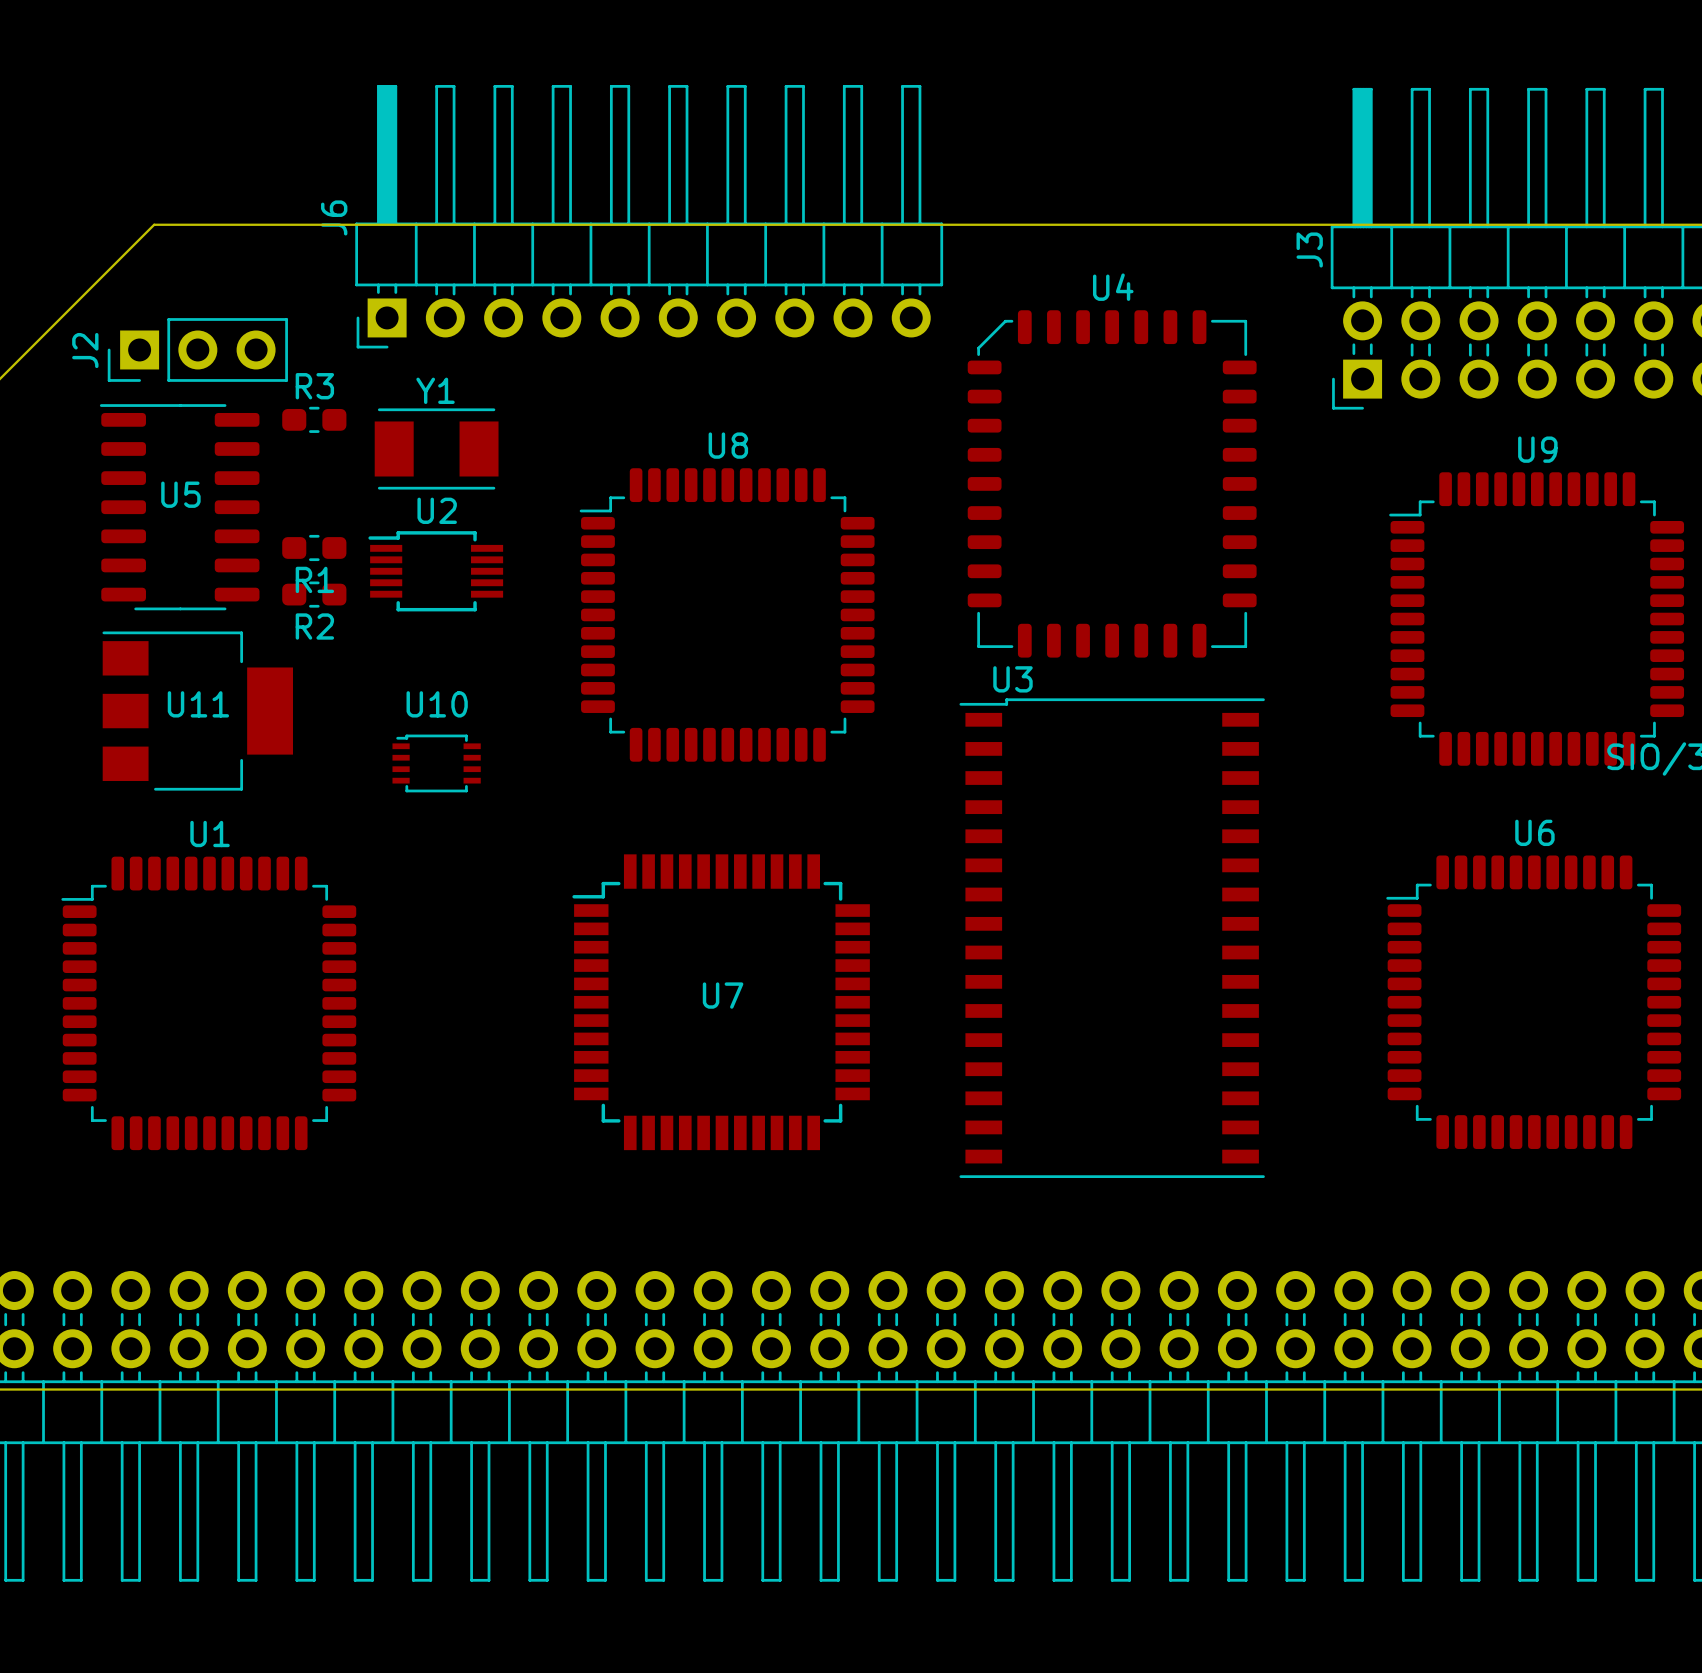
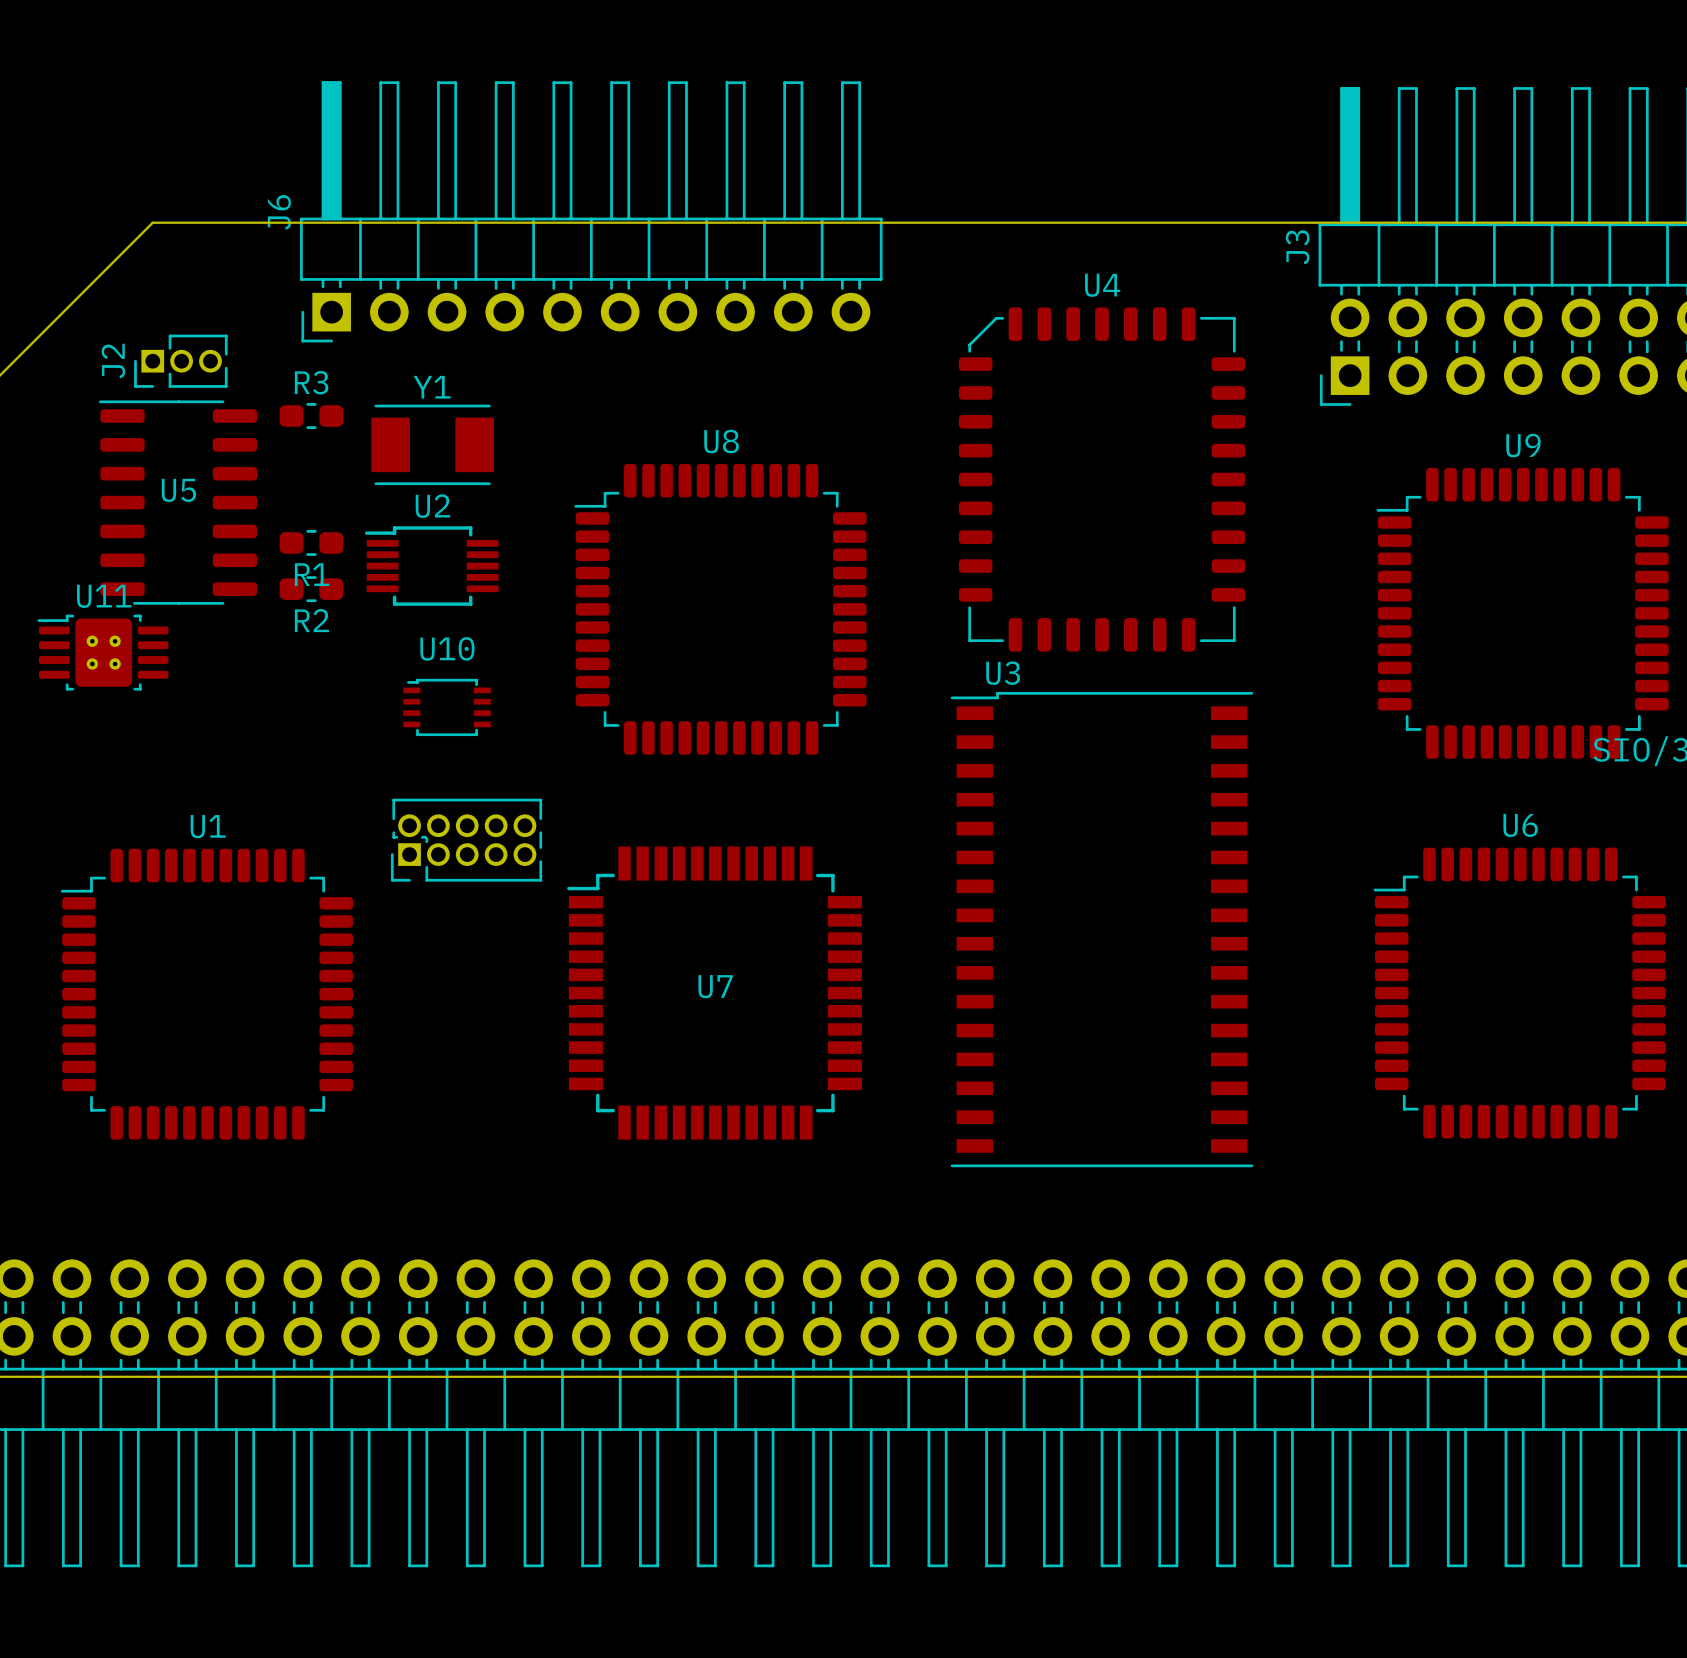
J6 position: (649, 216) -> (591, 211)
J2 footprint: [107, 318, 288, 382] -> [134, 334, 228, 388]
U11 footprint: [102, 631, 294, 791] -> [37, 614, 169, 691]
U11 name position: U11 (198, 704) -> U11 (104, 596)
U10 position: (436, 763) -> (447, 707)
part: none -> (466, 840)

